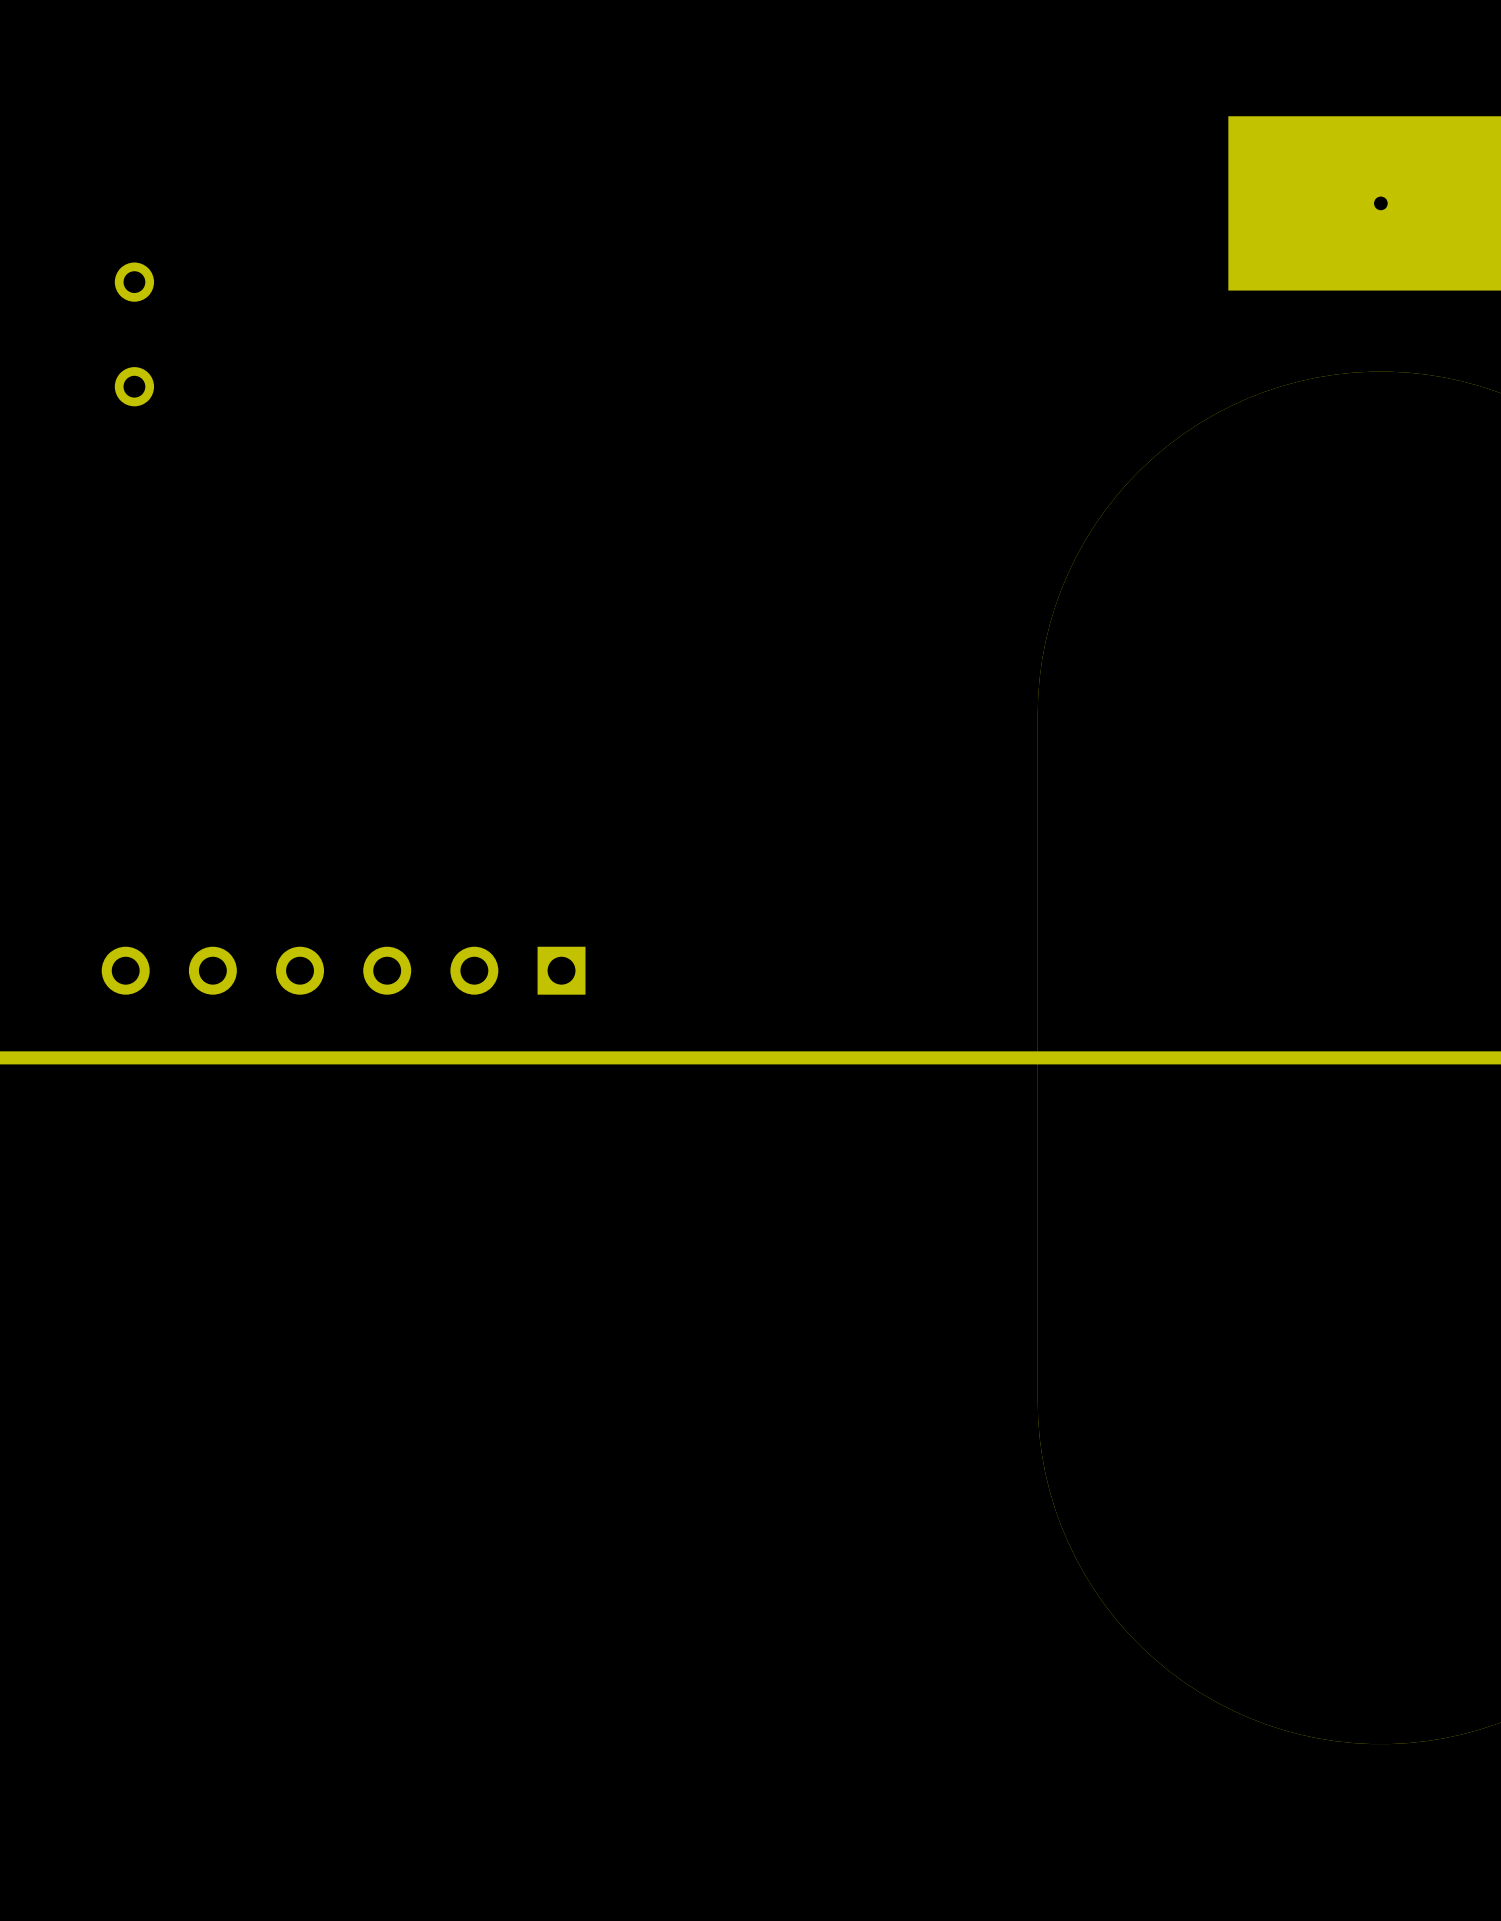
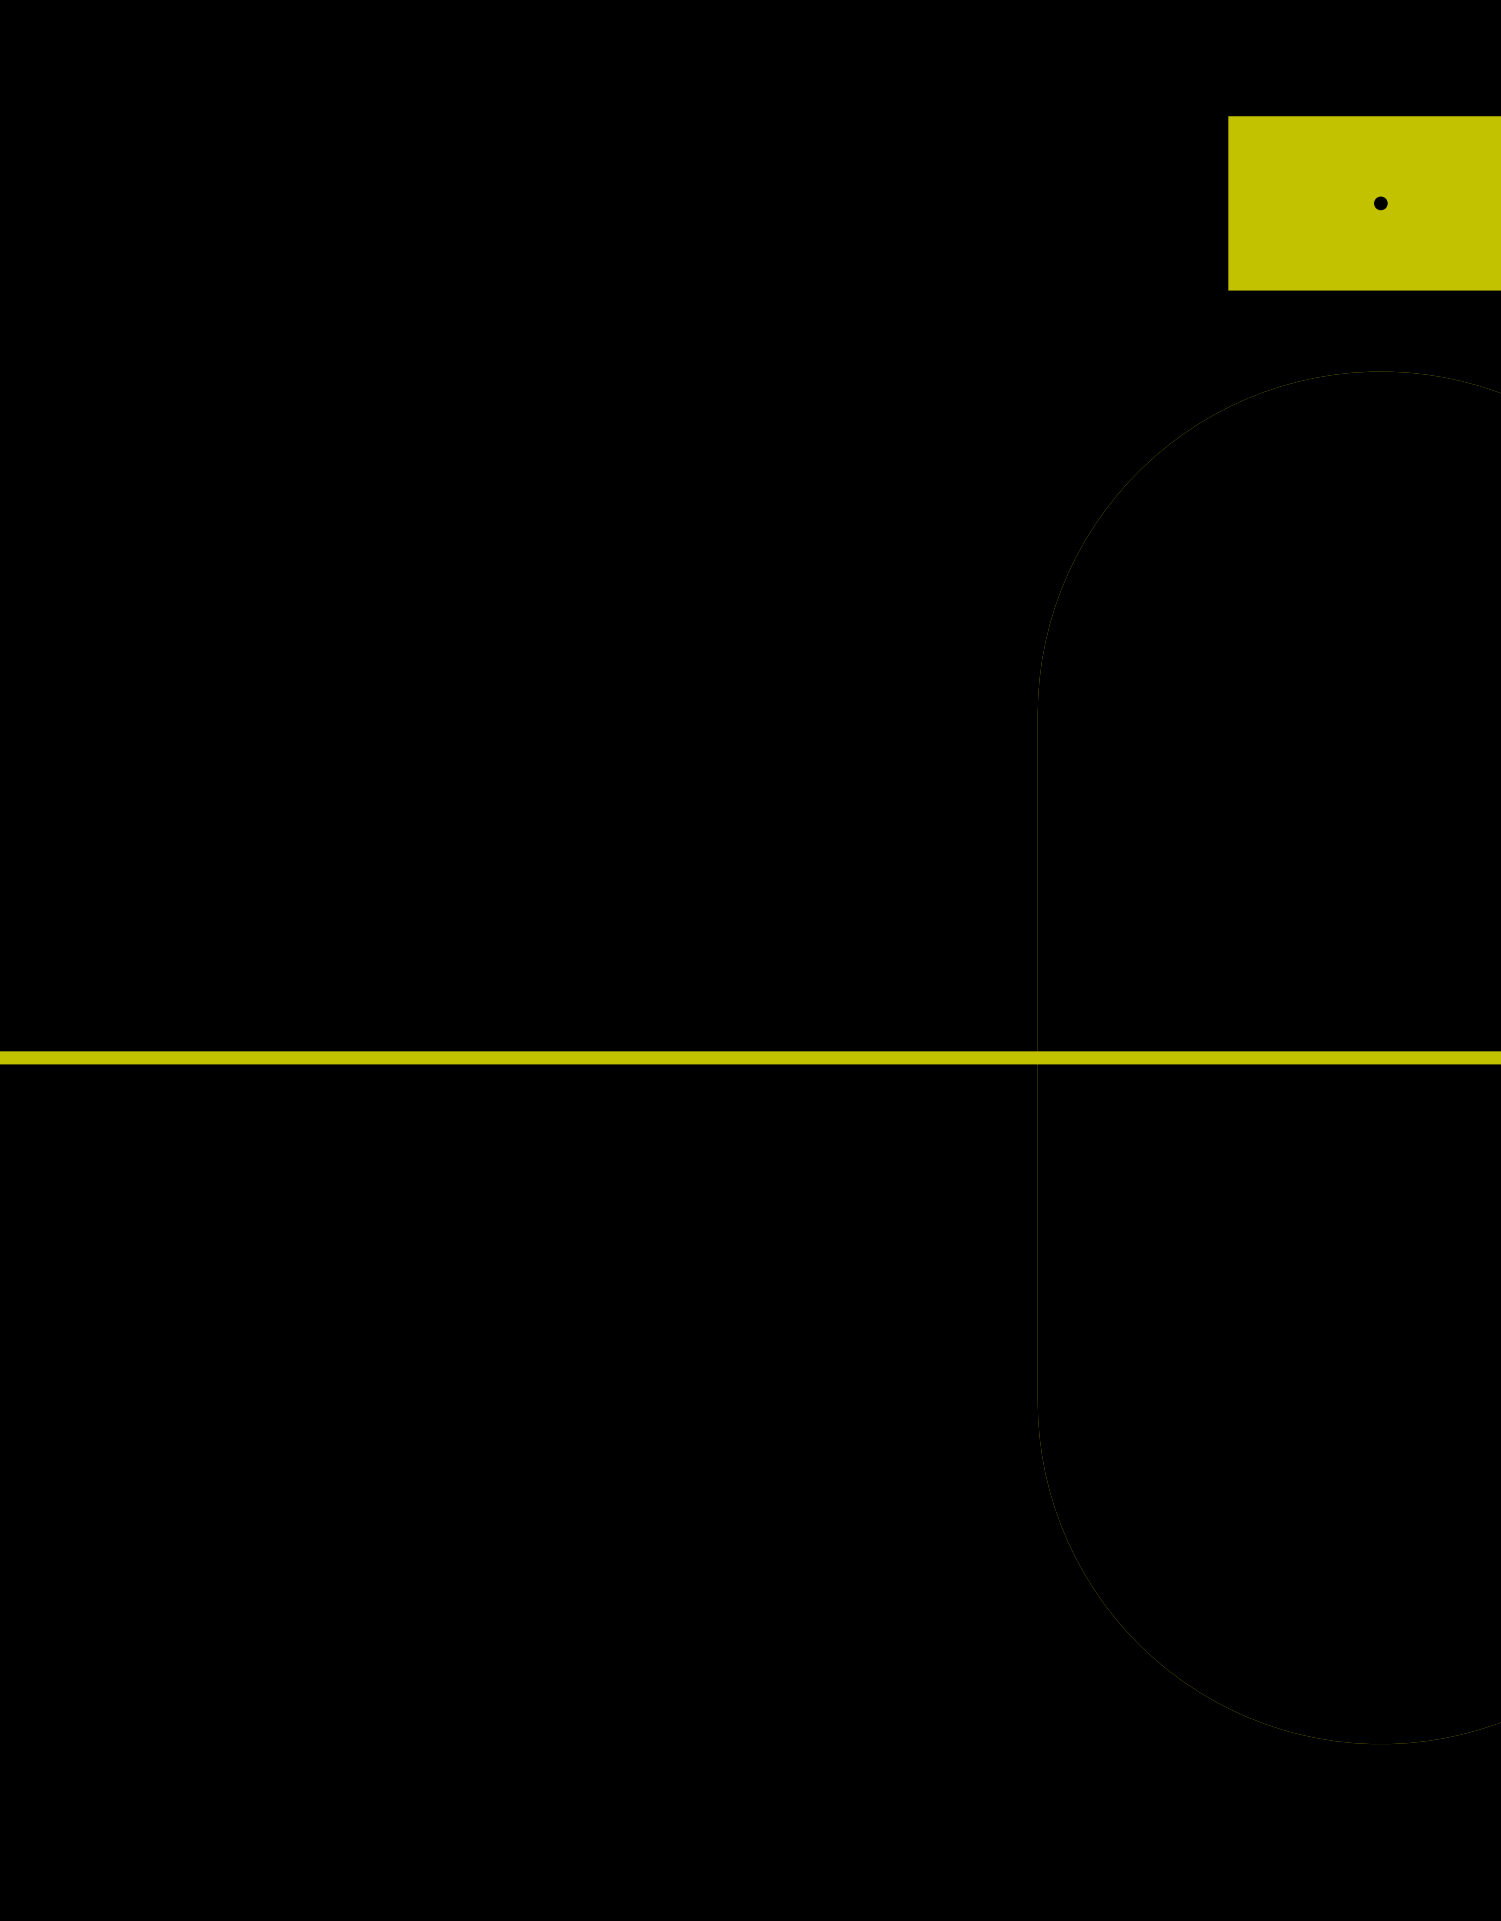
part: (134, 282) -> none
part: (134, 386) -> none
part: (343, 970) -> none

